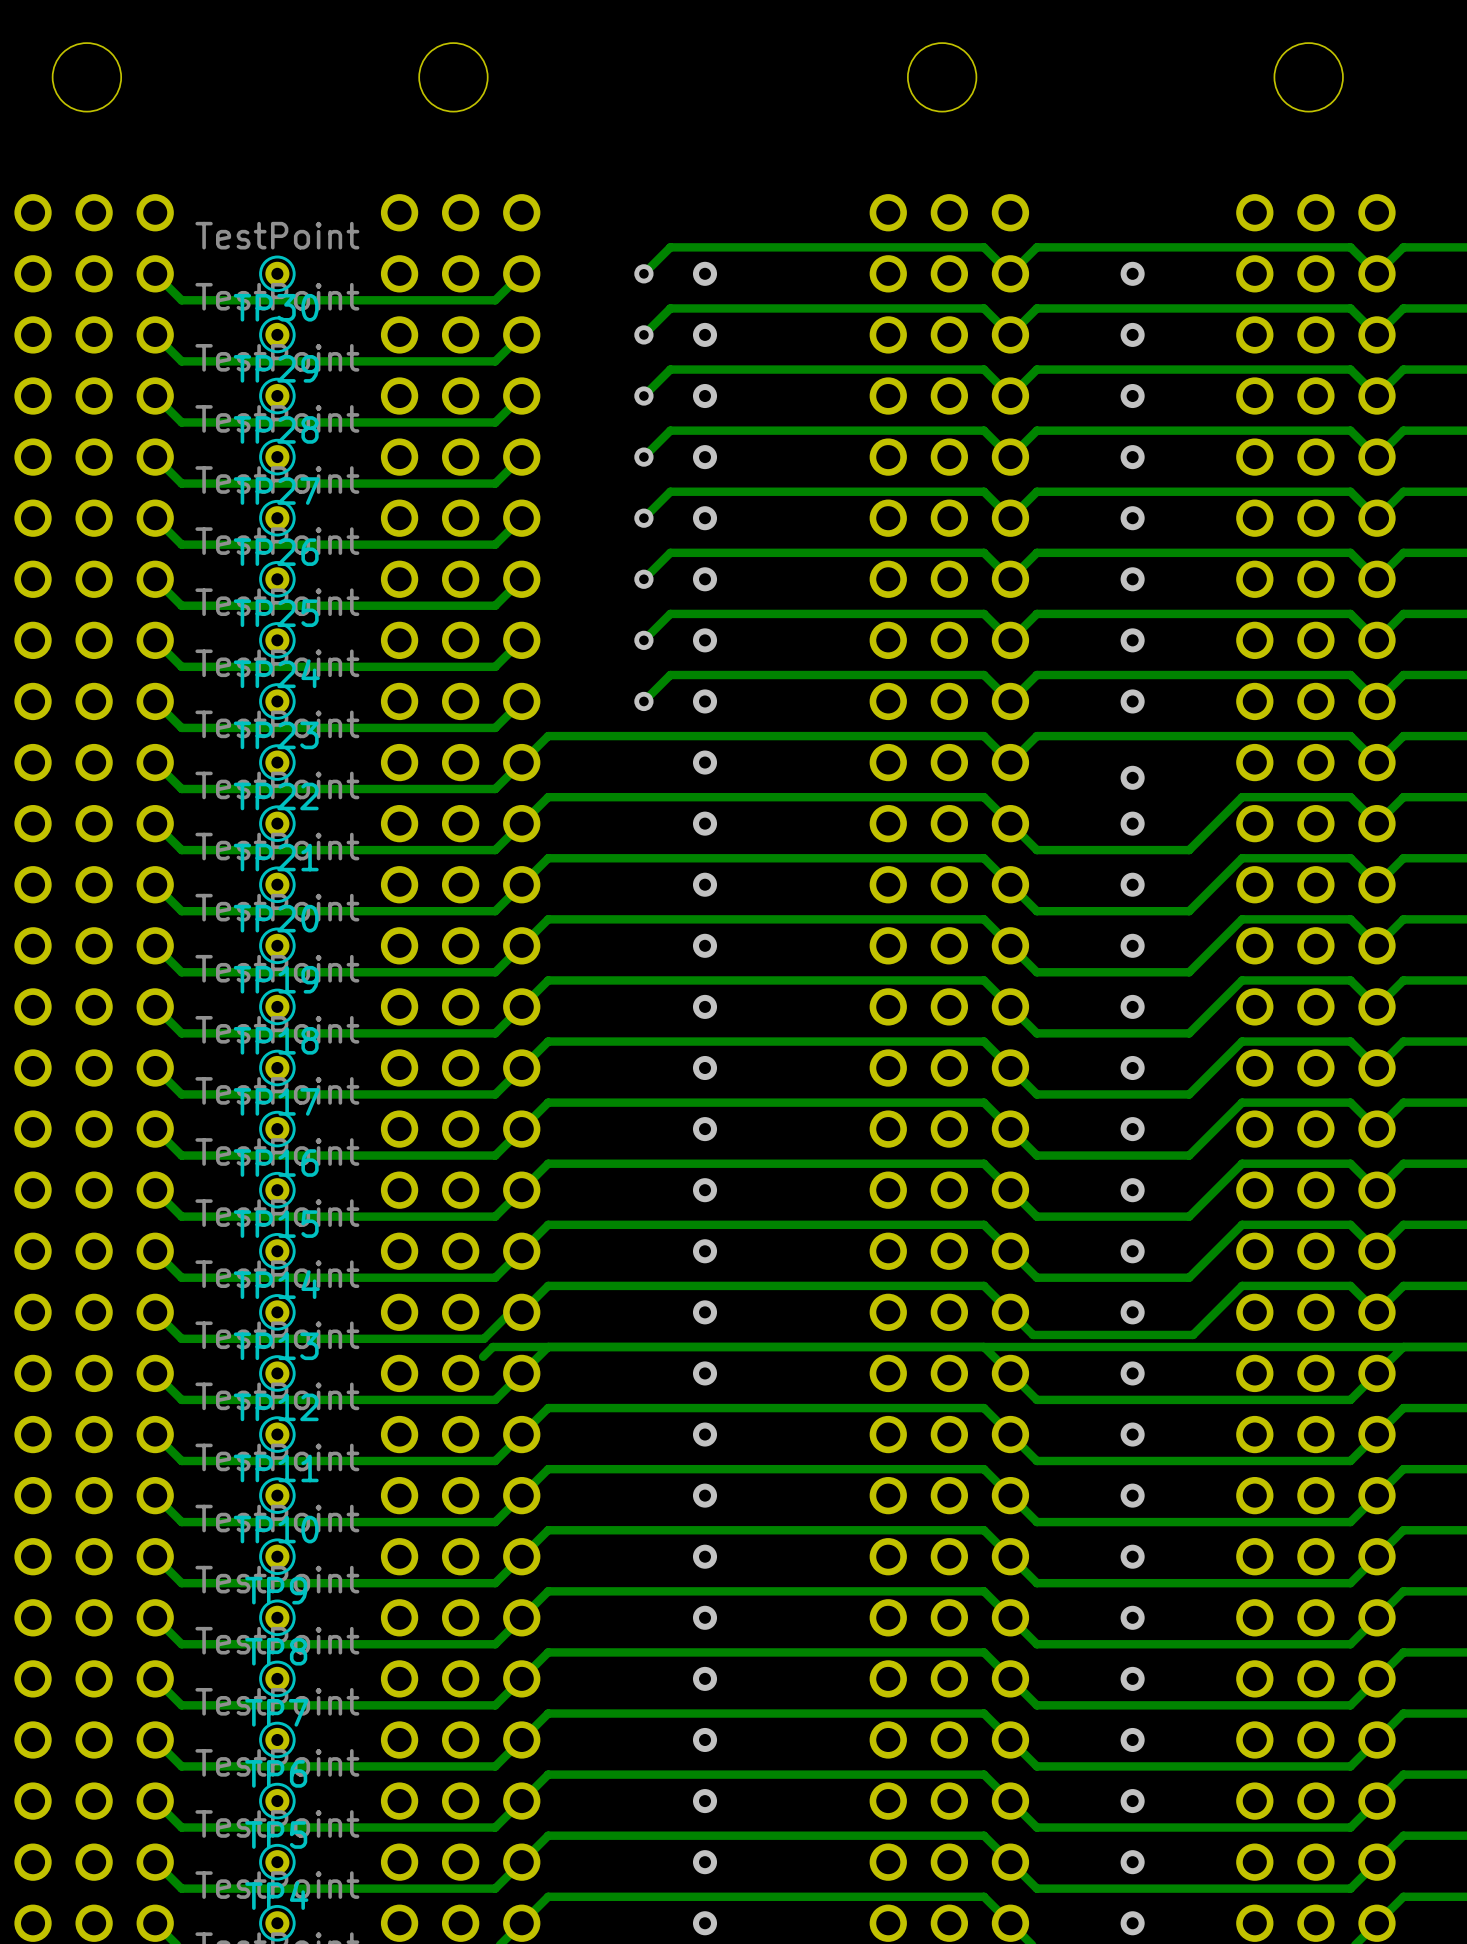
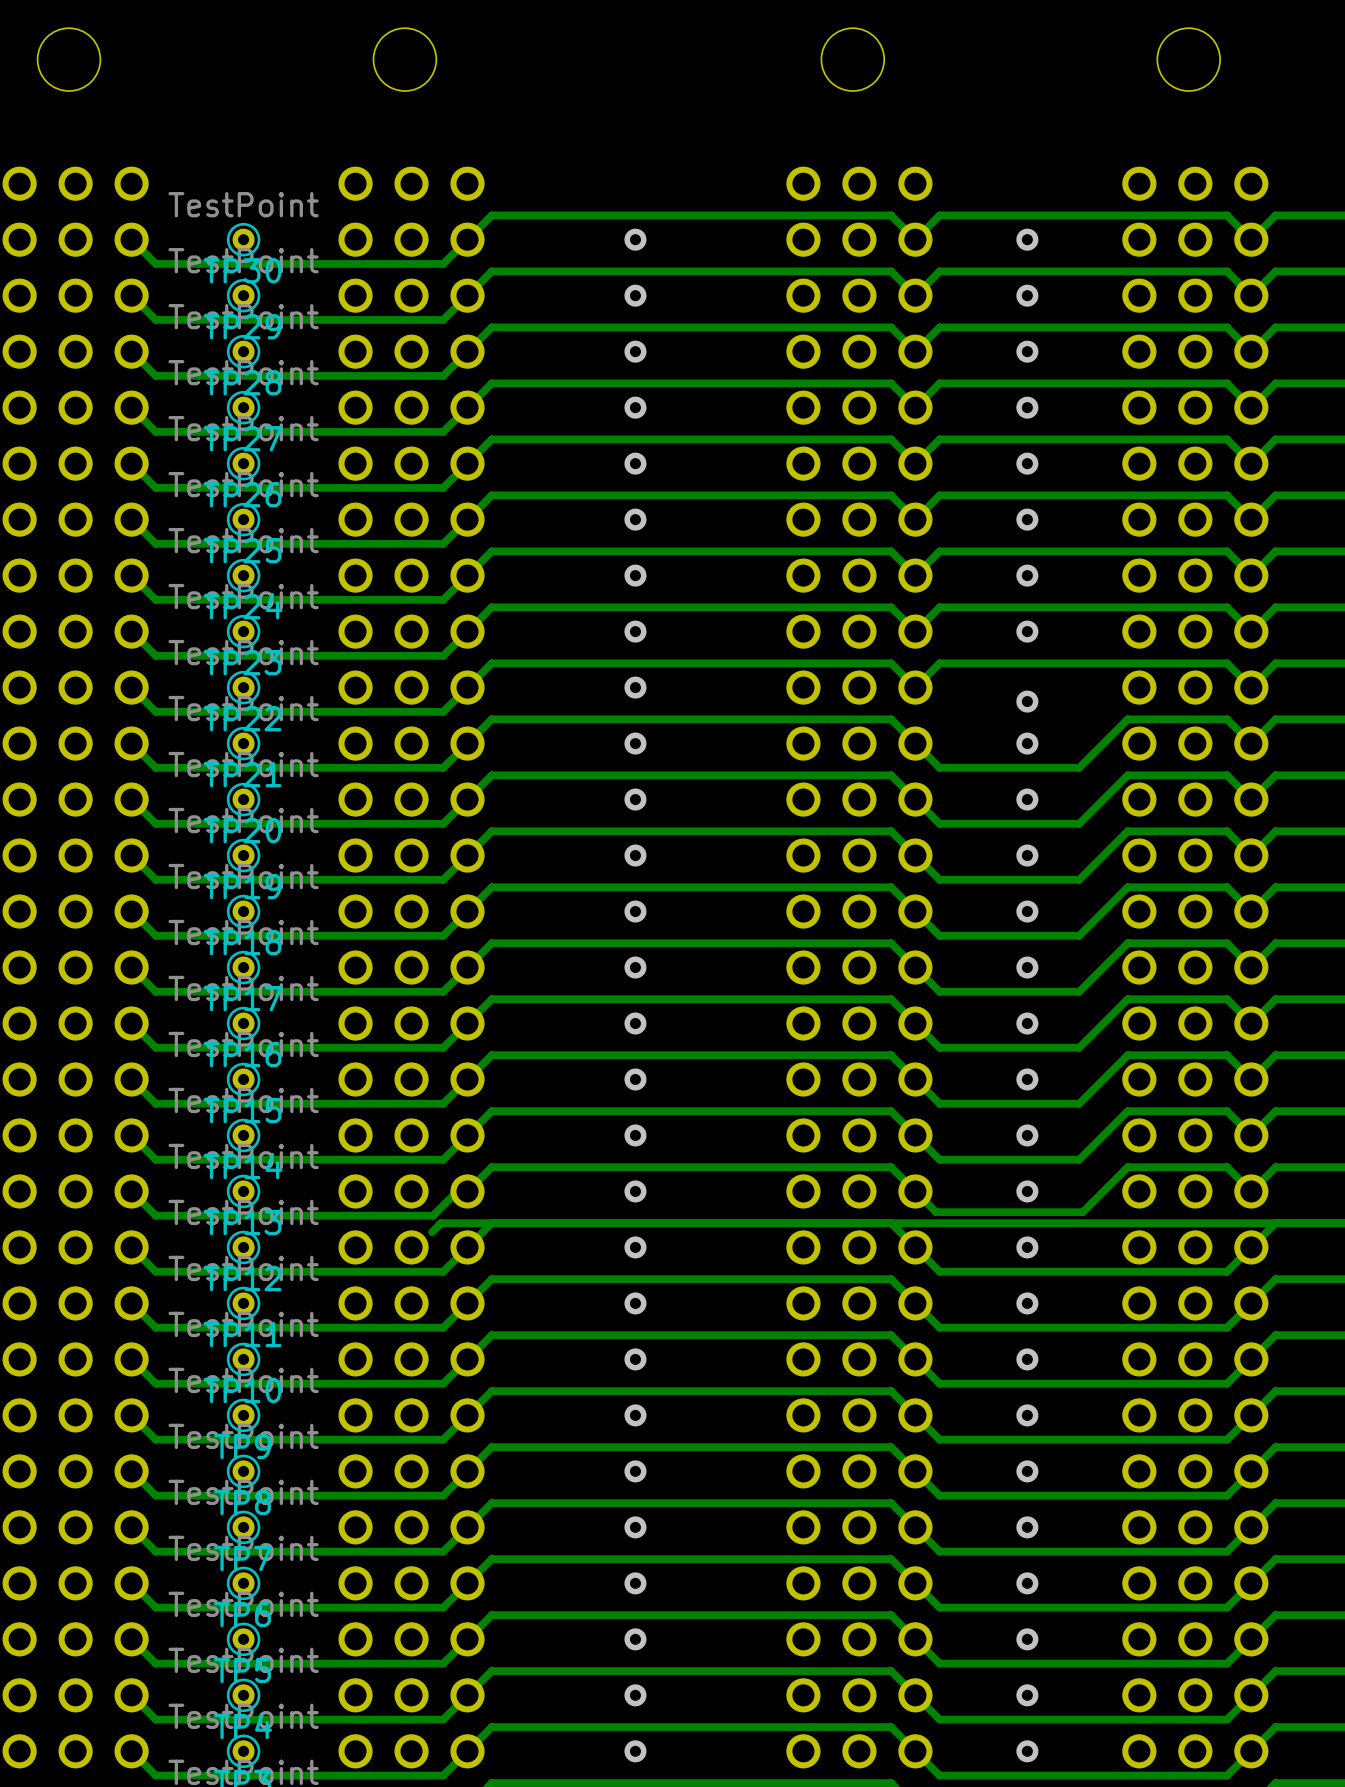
track: (670, 247) (643, 273) -> (603, 215) (491, 215) (467, 239)
via: (643, 273) -> none
track: (670, 308) (643, 334) -> (603, 271) (491, 271) (467, 295)
via: (643, 334) -> none
track: (670, 369) (643, 396) -> (603, 327) (491, 327) (467, 351)
via: (643, 396) -> none
track: (670, 430) (643, 457) -> (603, 383) (491, 383) (467, 407)
via: (643, 457) -> none
track: (670, 491) (643, 518) -> (603, 439) (491, 439) (467, 463)
via: (643, 518) -> none
track: (670, 552) (643, 579) -> (603, 495) (491, 495) (467, 519)
via: (643, 579) -> none
track: (670, 613) (643, 640) -> (603, 551) (491, 551) (467, 575)
via: (643, 640) -> none
track: (670, 675) (643, 701) -> (603, 607) (491, 607) (467, 631)
via: (643, 701) -> none

